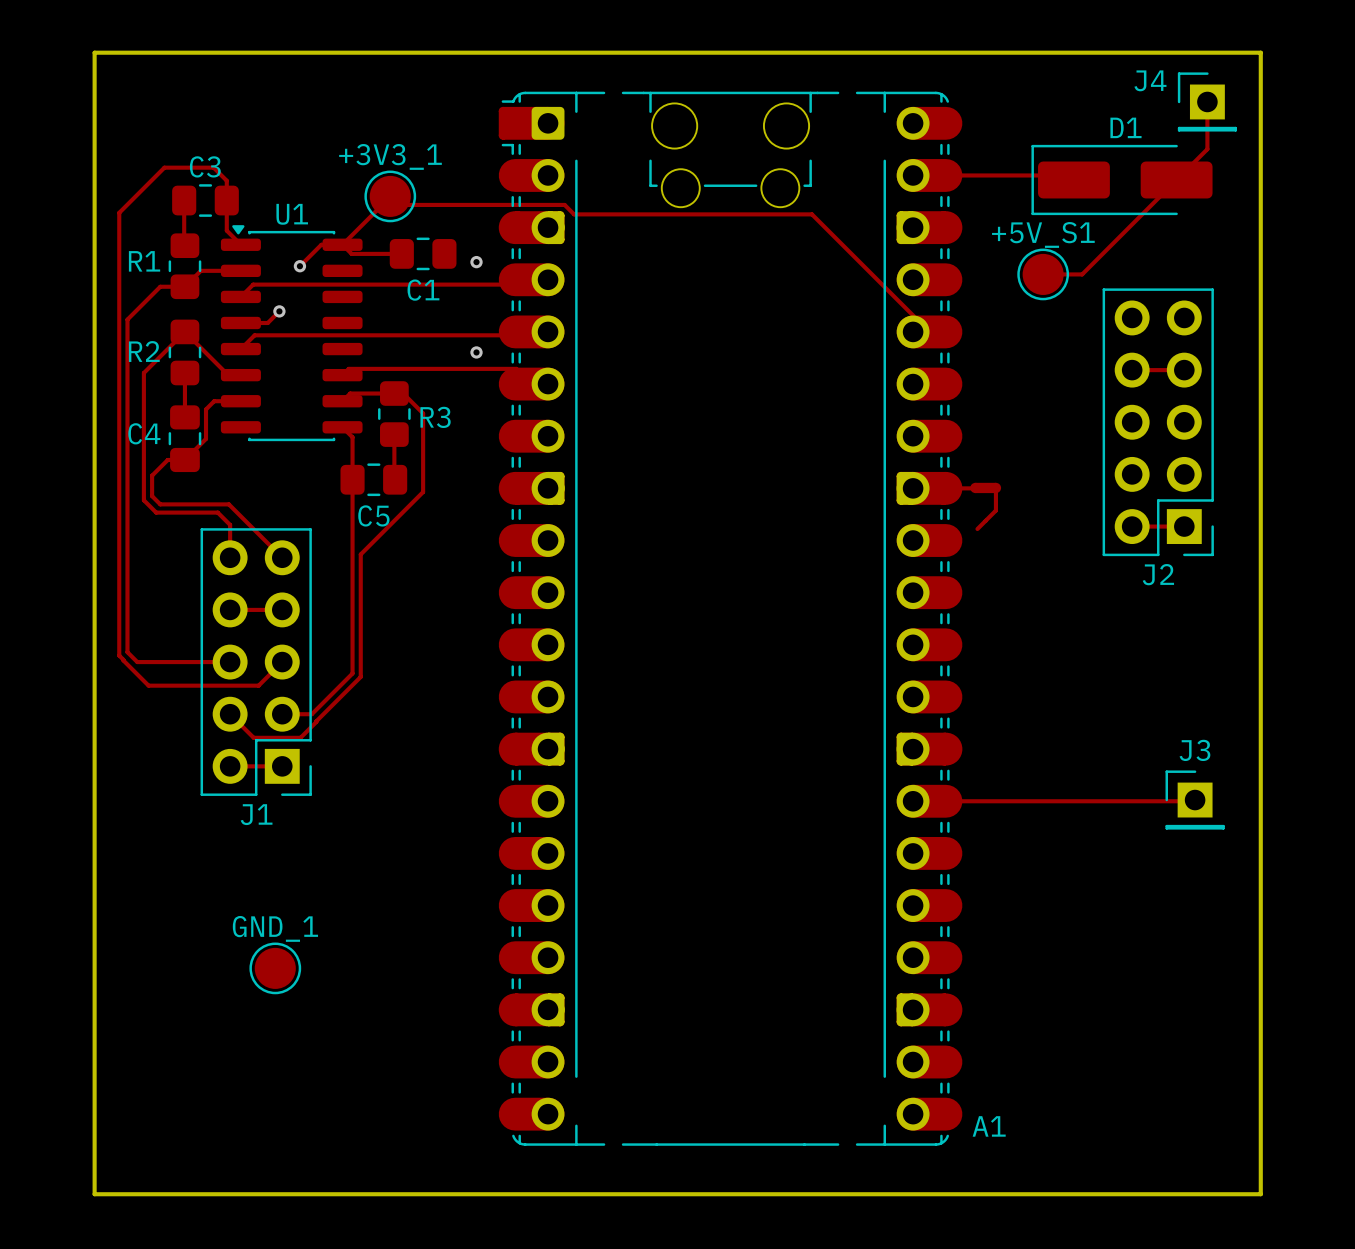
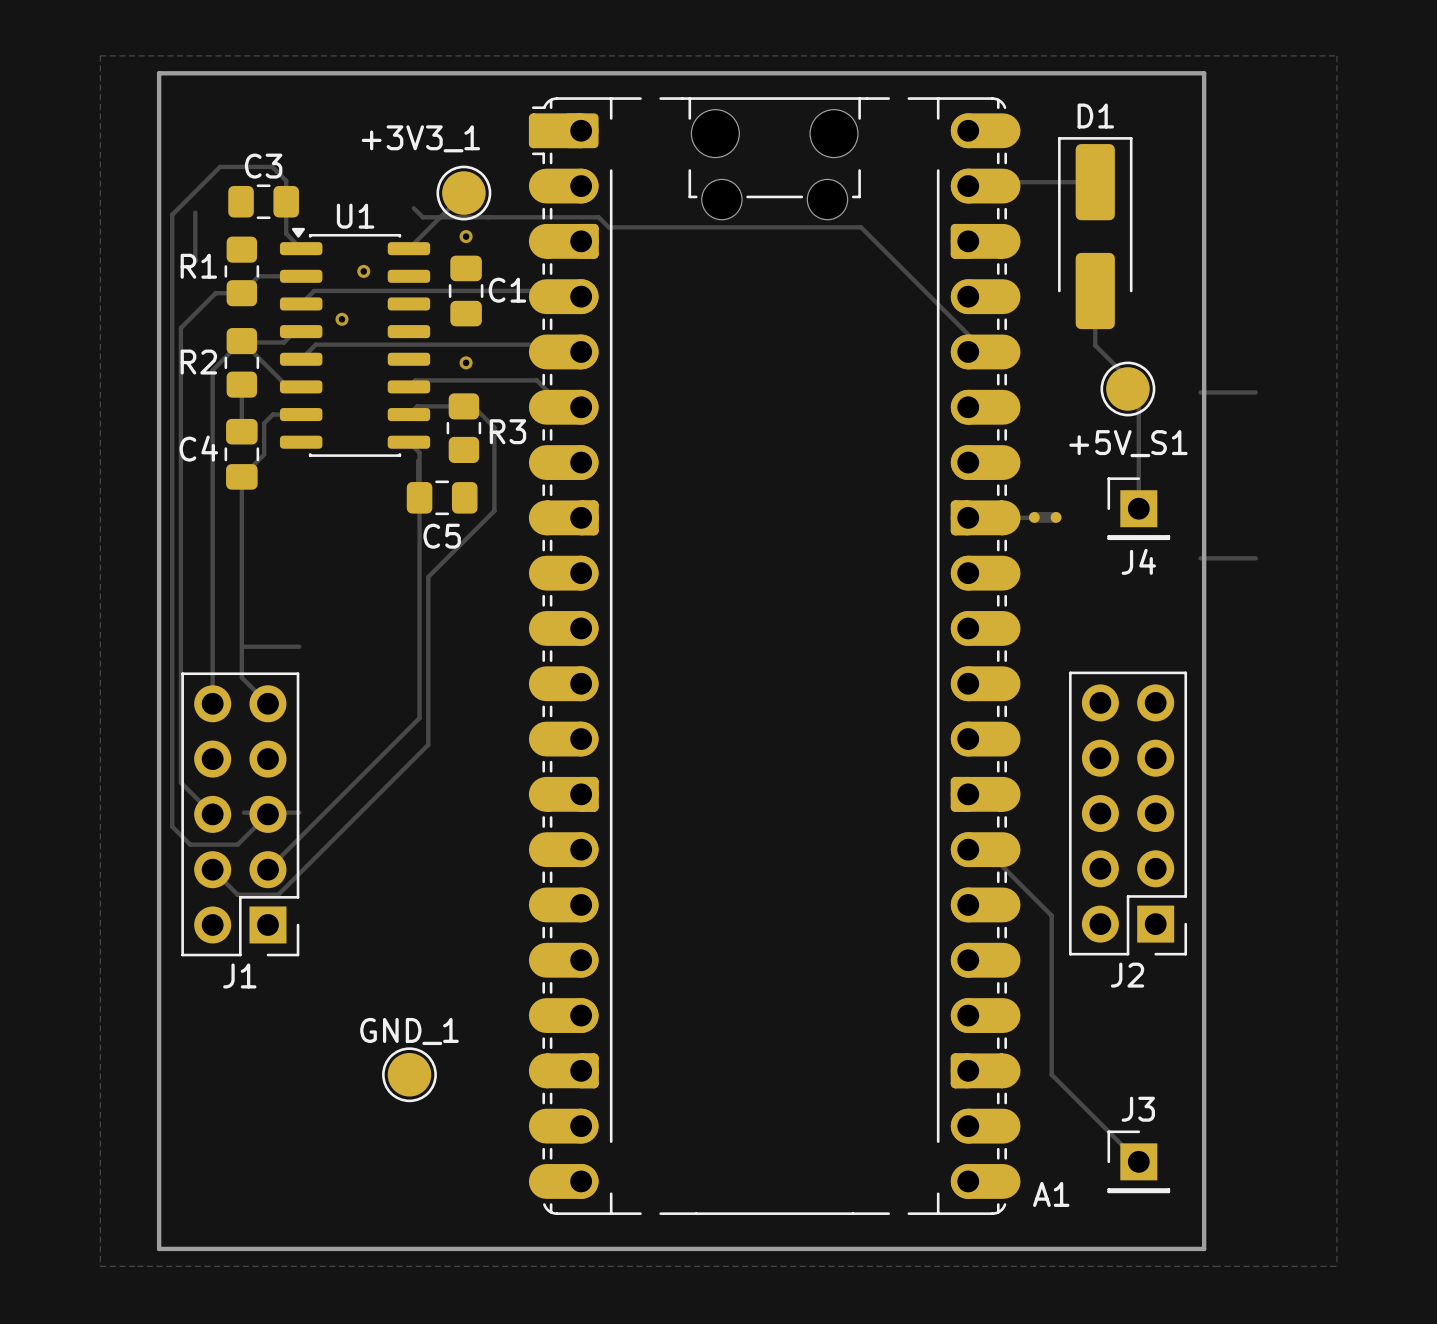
board edge: (94, 52) (1260, 52) (1260, 1194) (94, 1194) (94, 52) -> (159, 73) (159, 1248) (1204, 1248) (1204, 73) (159, 73)
J4 name position: J4 (1150, 80) -> J4 (1138, 561)
track: (1207, 101) (1207, 149) (1082, 274) (1043, 274) -> none
J4 position: (1207, 101) -> (1138, 508)
D1 name position: D1 (1125, 127) -> D1 (1095, 116)
+3V3_1 name position: +3V3_1 (390, 156) -> +3V3_1 (420, 138)
track: (929, 175) (1069, 175) (1073, 179) -> (985, 186) (989, 182) (1095, 182)
D1 rotation: 0° (1122, 179) -> 90° clockwise (1095, 233)
+3V3_1 position: (390, 196) -> (463, 193)
C3 position: (205, 200) -> (263, 201)
track: (382, 204) (342, 244) -> (451, 206) (408, 248)
via: none -> (466, 236)
track: none -> (301, 248) (286, 233) (286, 180) (272, 166) (220, 166) (172, 214) (172, 826) (190, 844) (237, 844) (267, 814)
+5V_S1 name position: +5V_S1 (1043, 234) -> +5V_S1 (1128, 443)
track: (240, 244) (226, 230) (226, 180) (213, 167) (164, 167) (119, 212) (119, 655) (148, 685) (258, 685) (282, 662) -> none
track: (342, 244) (321, 244) (299, 266) -> none
track: (342, 244) (351, 253) (401, 253) -> none
C1 rotation: 0° (423, 253) -> 90° clockwise (466, 291)
via: none -> (363, 271)
track: none -> (299, 277) (301, 276) (258, 276) (241, 293) (215, 293) (180, 328) (180, 782) (212, 814)
via: (476, 262) -> none
R1 position: (184, 266) -> (241, 271)
via: (299, 266) -> none
track: (239, 272) (240, 270) (200, 270) (184, 286) (160, 286) (127, 319) (127, 652) (137, 662) (230, 662) -> none
track: none -> (1095, 291) (1095, 345) (1127, 378) (1127, 388) (1138, 399) (1138, 508)
+5V_S1 position: (1043, 274) -> (1127, 388)
track: (531, 279) (526, 284) (253, 284) (240, 296) -> (563, 296) (557, 290) (314, 290) (301, 303)
C1 name position: C1 (423, 290) -> C1 (507, 290)
via: none -> (341, 319)
via: (279, 311) -> none
track: (531, 331) (528, 335) (254, 335) (240, 349) -> (563, 351) (556, 344) (315, 344) (301, 359)
U1 position: (291, 333) -> (355, 342)
R2 position: (184, 352) -> (241, 362)
via position: (476, 352) -> (466, 362)
track: none -> (301, 386) (287, 386) (241, 341) (212, 370) (212, 703)
track: (516, 368) (348, 368) (342, 375) -> (547, 391) (536, 380) (415, 380) (408, 386)
track: (184, 372) (184, 417) -> (241, 384) (241, 431)
track: (240, 375) (228, 375) (184, 331) (143, 372) (143, 500) (156, 512) (217, 512) (230, 524) (230, 557) -> none
track: none -> (301, 414) (272, 414) (264, 423) (264, 454) (241, 476)
track: none -> (408, 414) (417, 406) (473, 406) (494, 427) (494, 510) (428, 577) (428, 744) (278, 894) (237, 894) (212, 869)
track: (240, 401) (214, 401) (206, 409) (206, 438) (184, 459) (167, 459) (152, 475) (152, 496) (160, 504) (228, 504) (282, 557) -> none
track: (342, 401) (350, 393) (403, 393) (423, 413) (423, 492) (360, 554) (360, 676) (300, 737) (253, 737) (230, 714) -> none
R3 position: (394, 414) -> (463, 428)
track: none -> (408, 442) (419, 452) (419, 718) (267, 869)
J2 position: (1158, 422) -> (1128, 813)
track: (342, 427) (352, 437) (352, 673) (311, 714) (282, 714) -> none
C4 position: (184, 438) -> (241, 454)
track: none -> (241, 476) (241, 677) (267, 703)
C5 position: (373, 479) -> (442, 497)
track: (995, 487) (995, 510) (977, 529) -> none
J1 position: (256, 662) -> (240, 814)
track: (1195, 800) (929, 801) -> (1138, 1161) (1051, 1074) (1051, 915) (985, 849)
J3 position: (1195, 800) -> (1138, 1161)
GND_1 position: (275, 968) -> (409, 1074)

